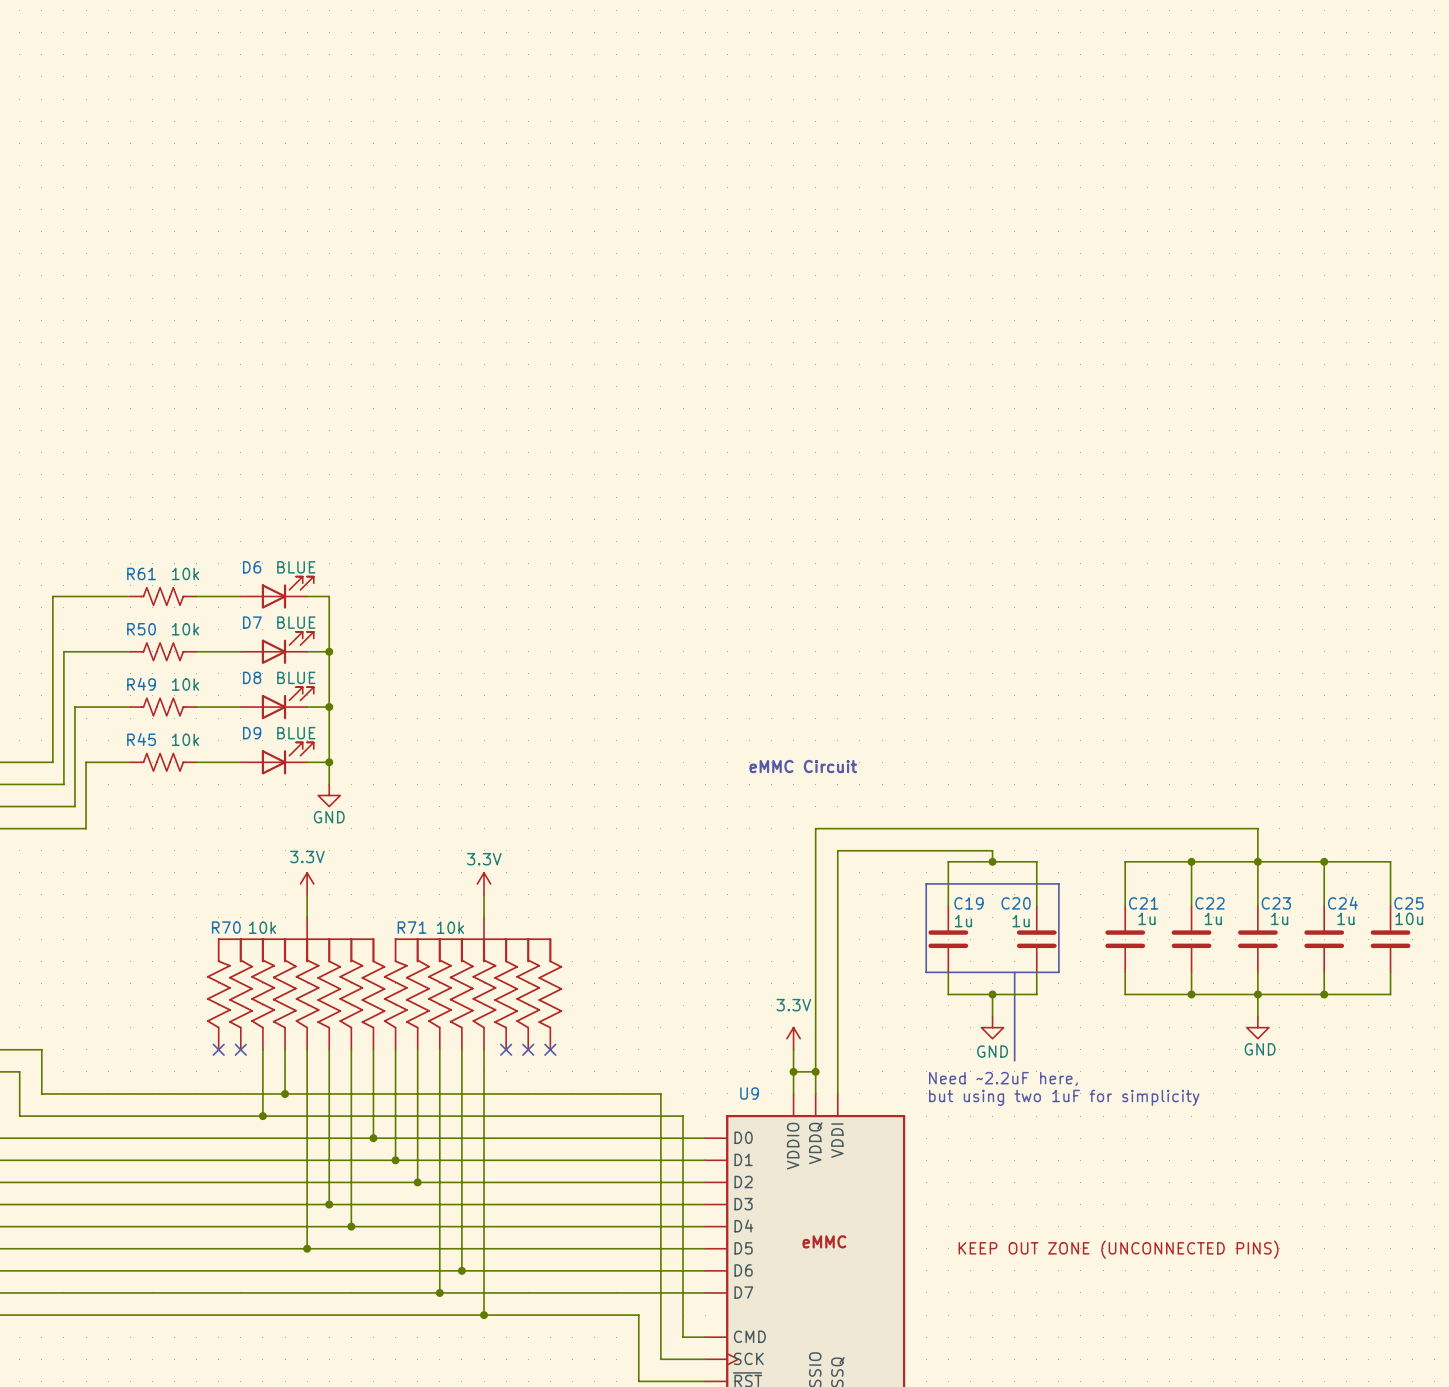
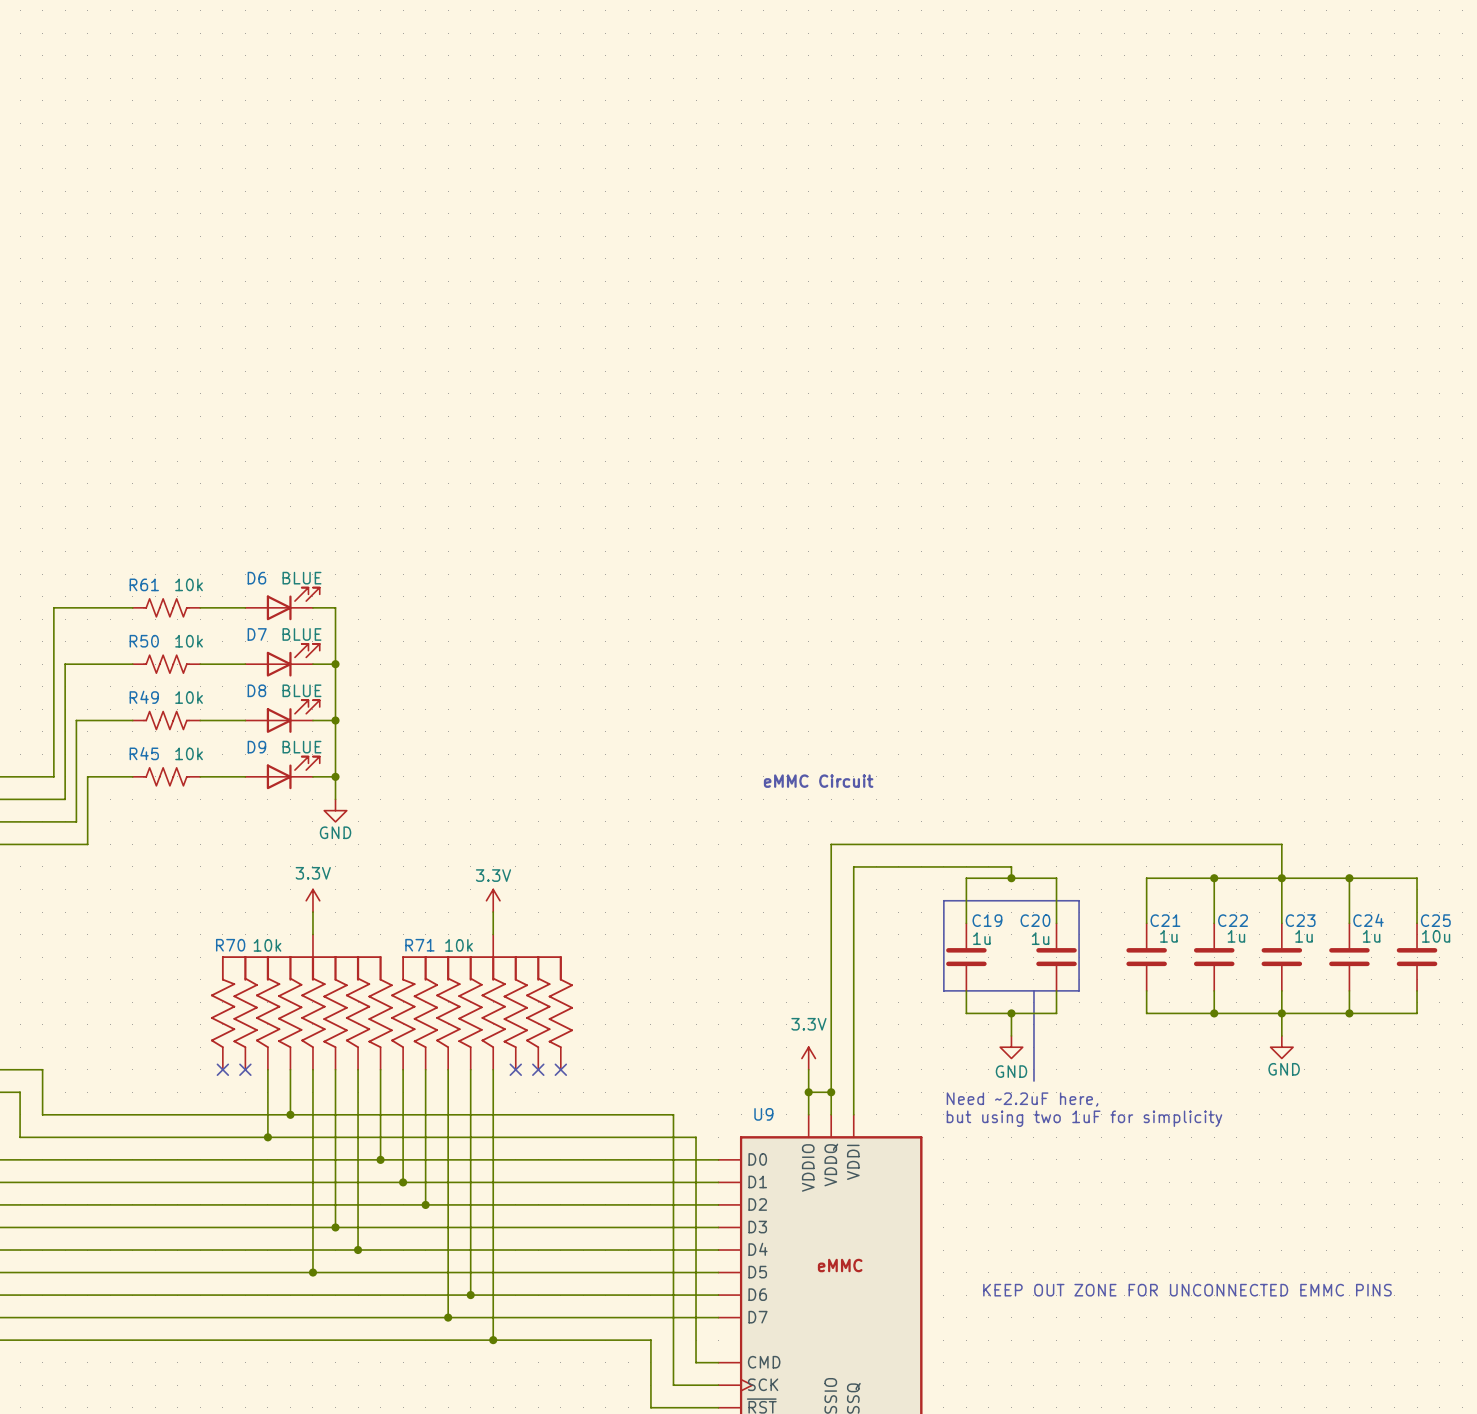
U9 text: KEEP OUT ZONE (UNCONNECTED PINS) (1118, 1249) -> none
text: none -> KEEP OUT ZONE FOR UNCONNECTED EMMC PINS (1187, 1290)

